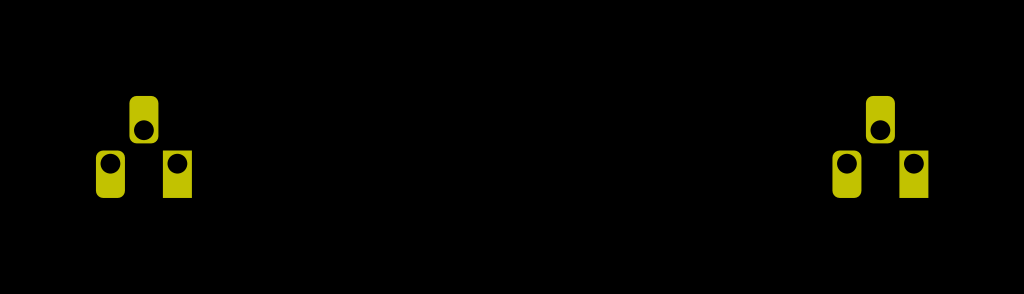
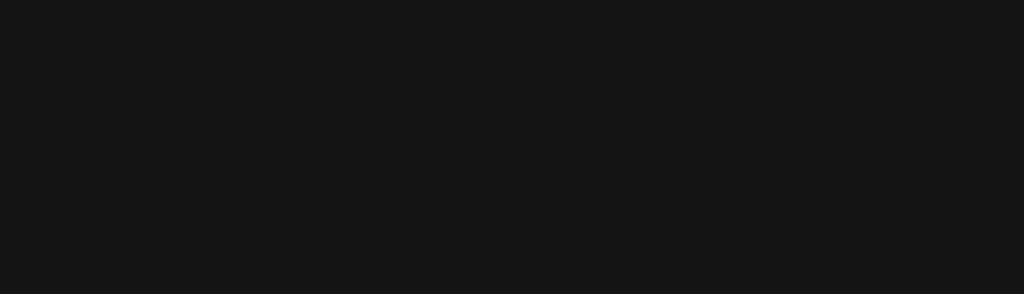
part: (143, 146) -> none
part: (880, 146) -> none

